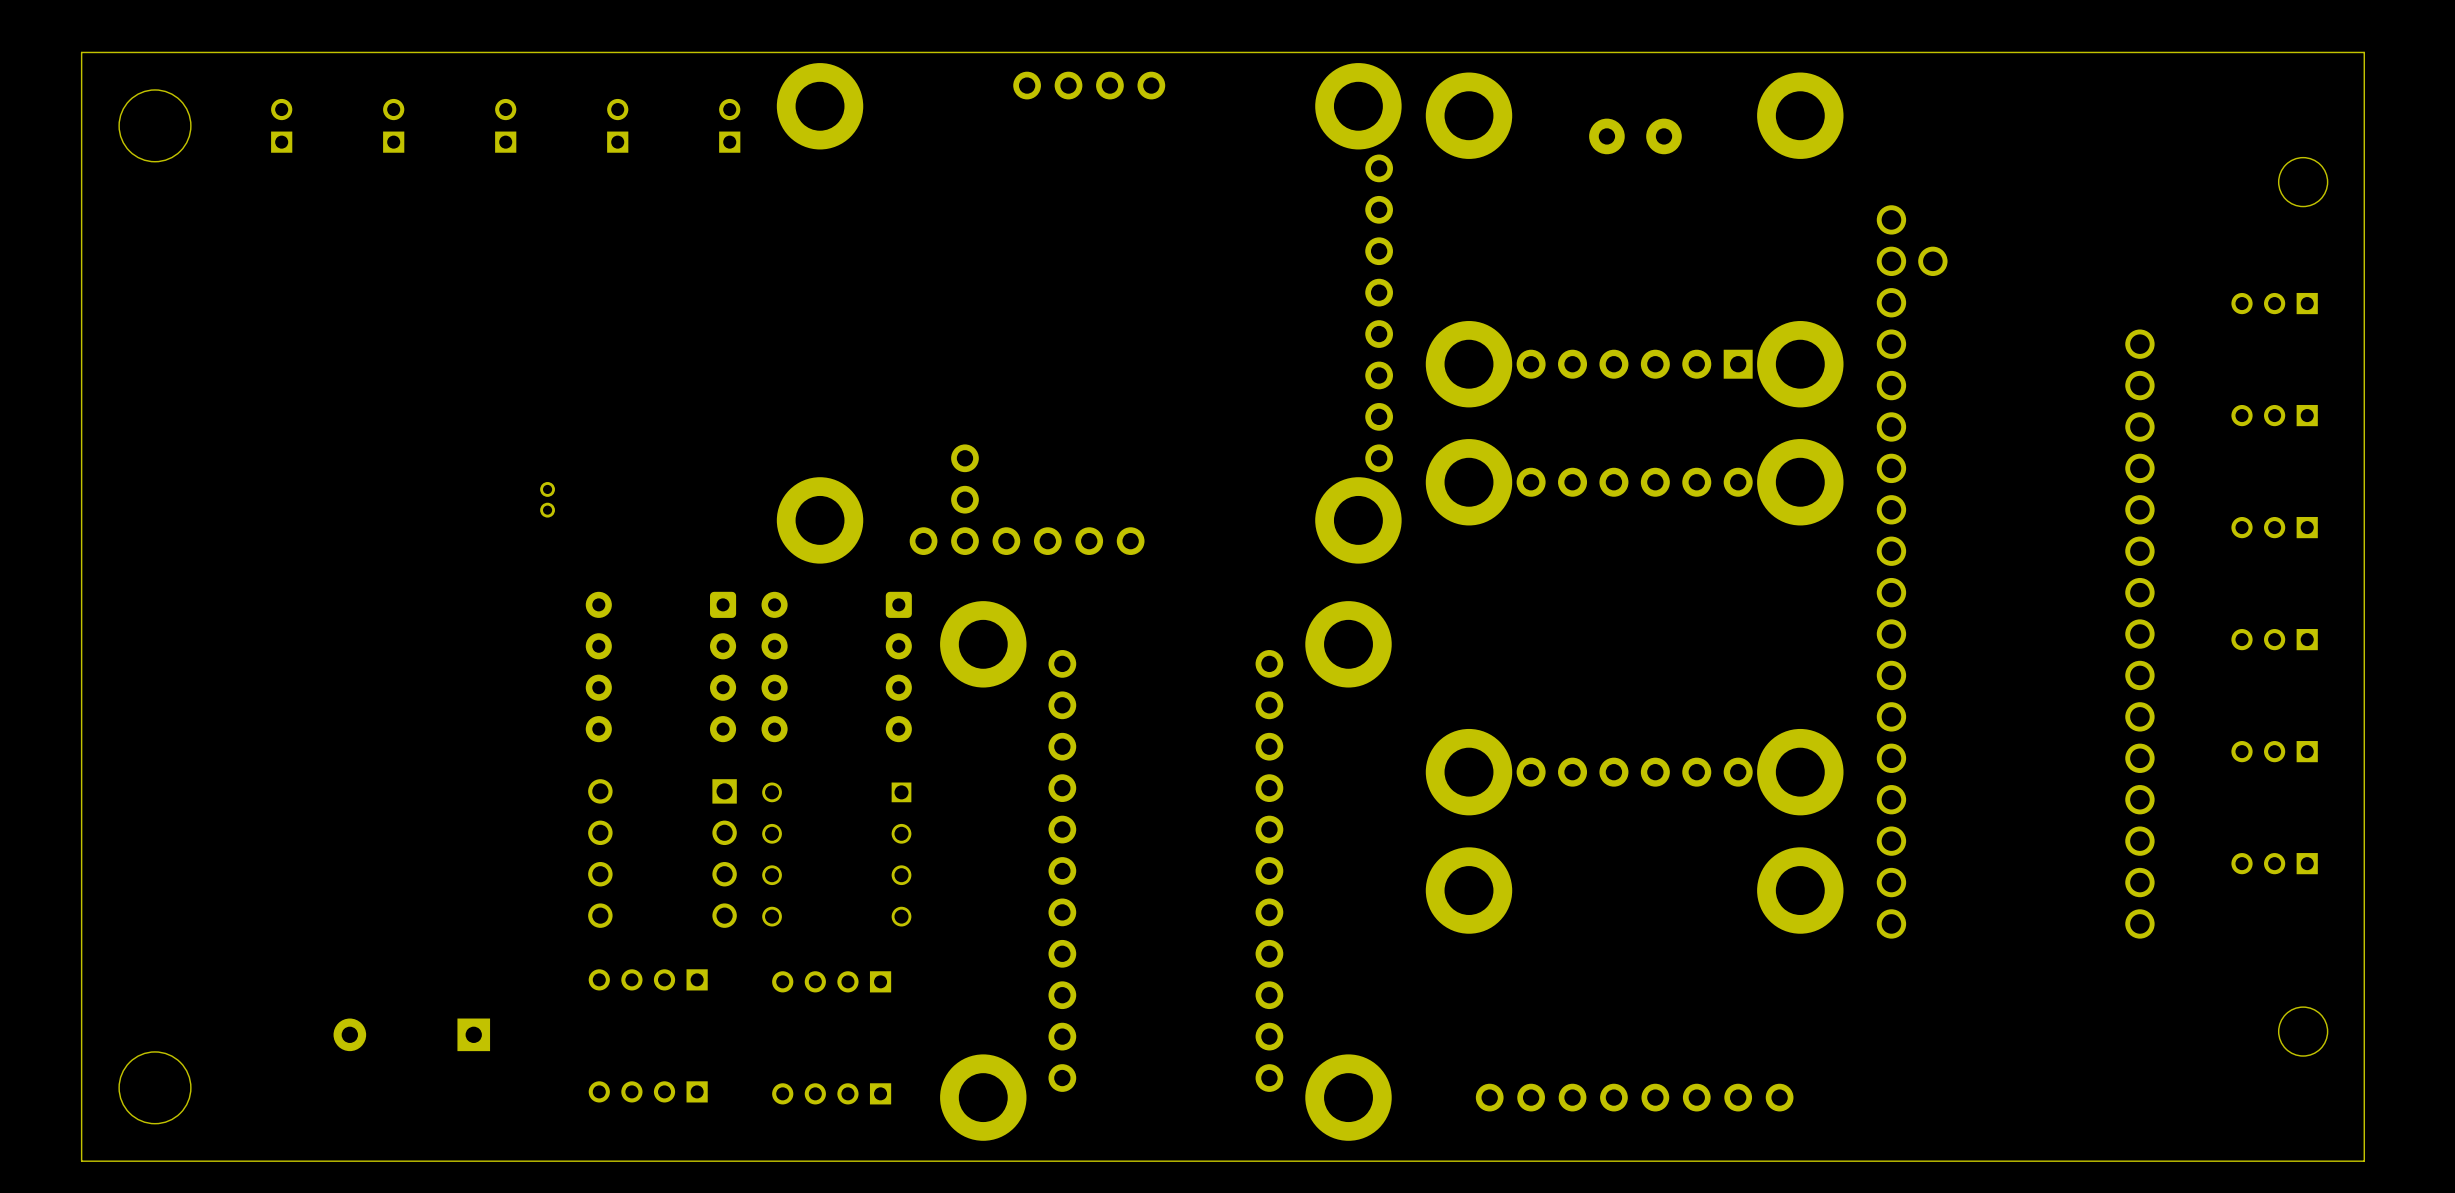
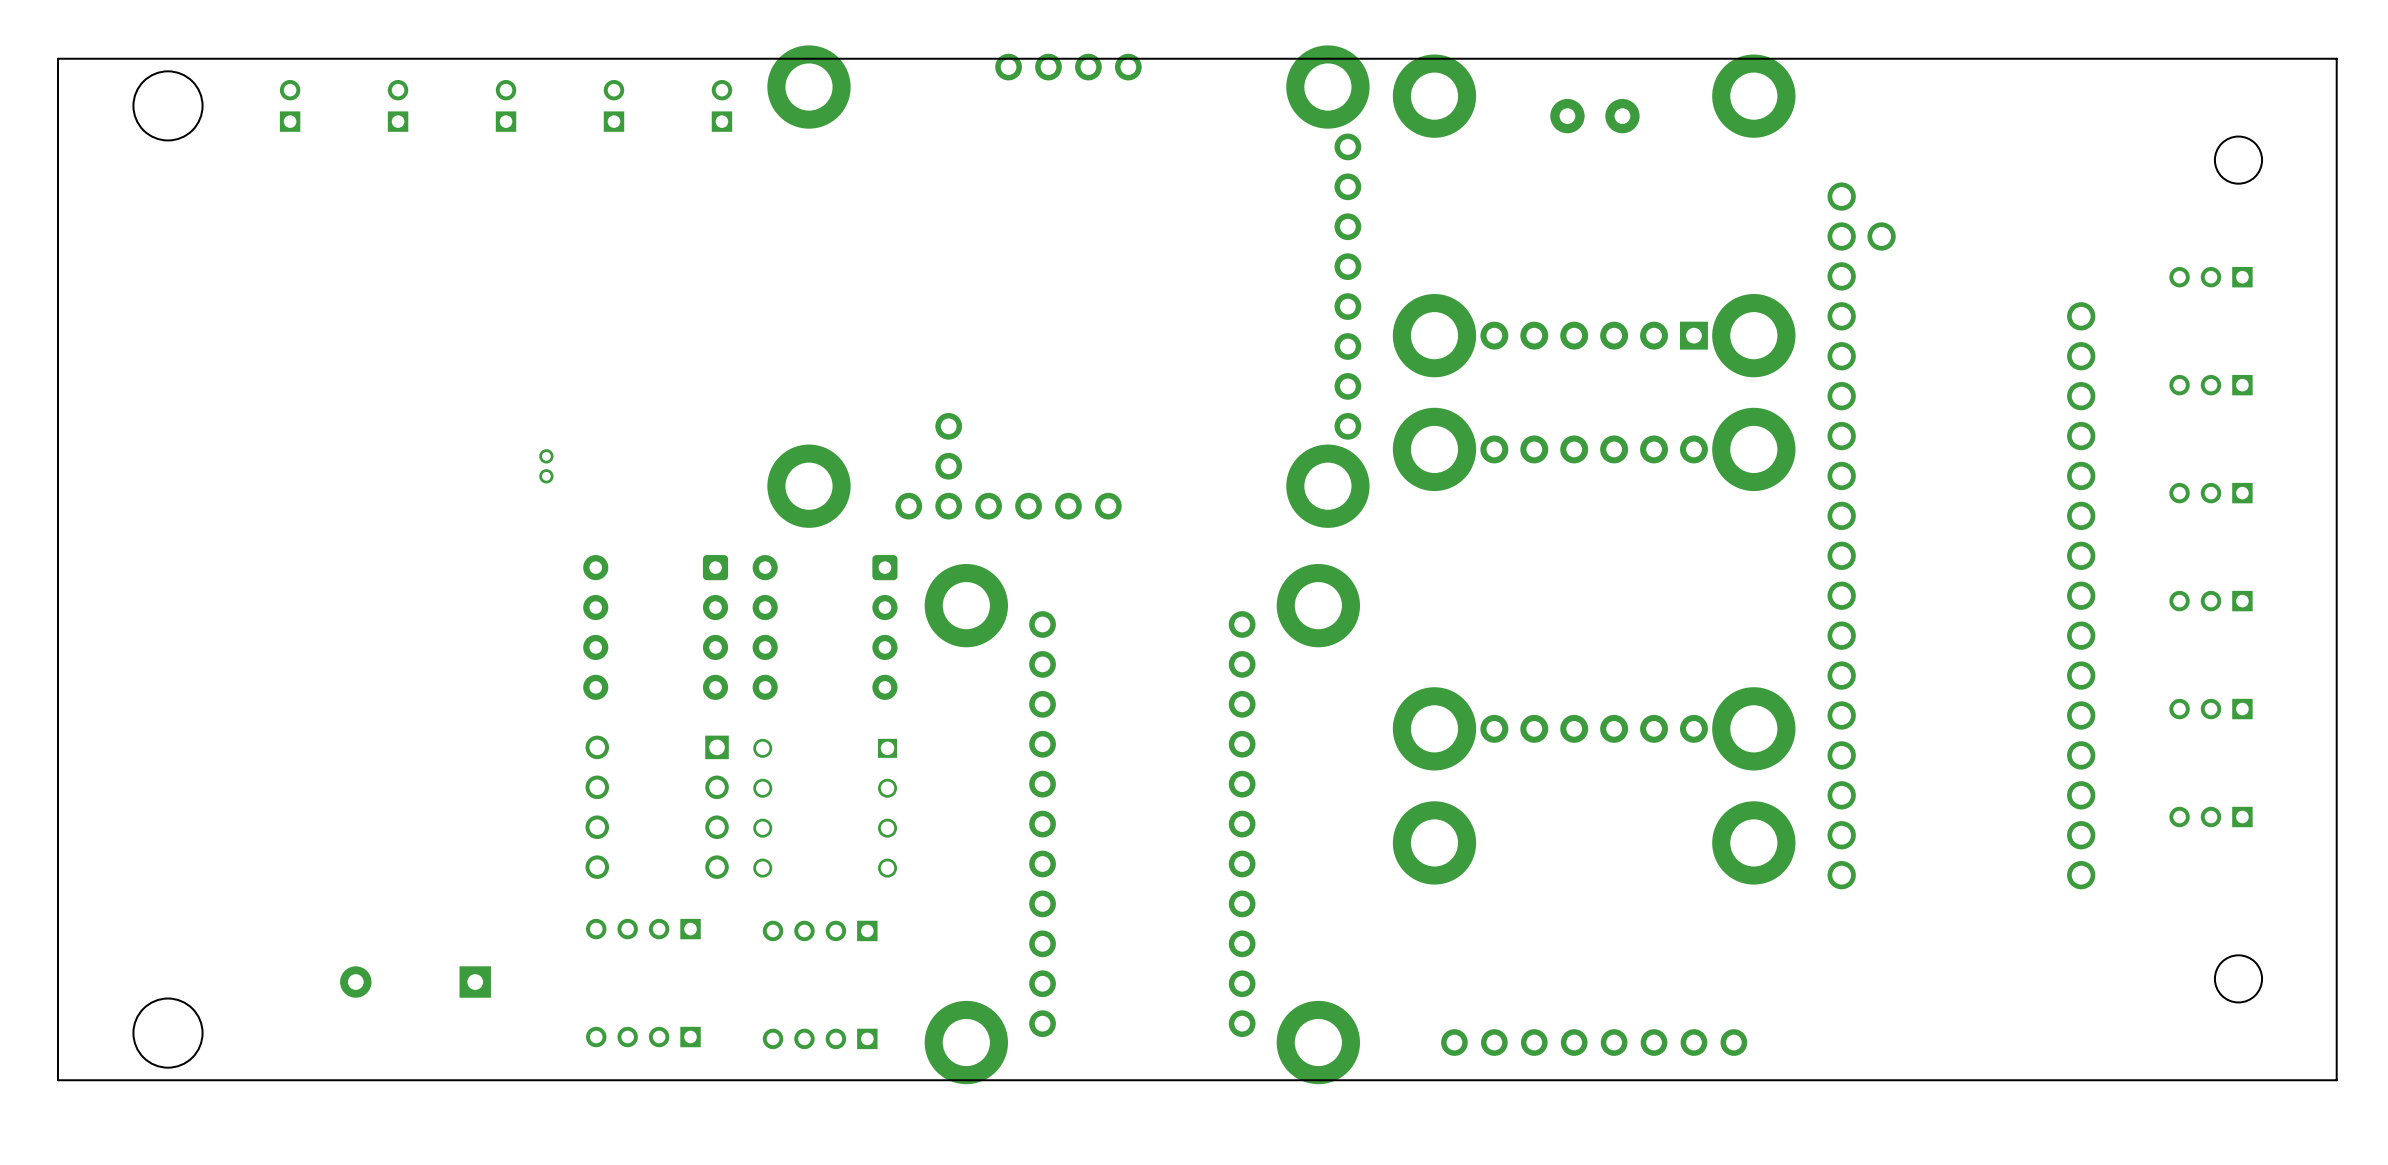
board edge: (2364, 52) (81, 52) (81, 1161) (2364, 1161) (2364, 52) -> (2336, 58) (2336, 1080) (57, 1080) (57, 58) (2336, 58)

